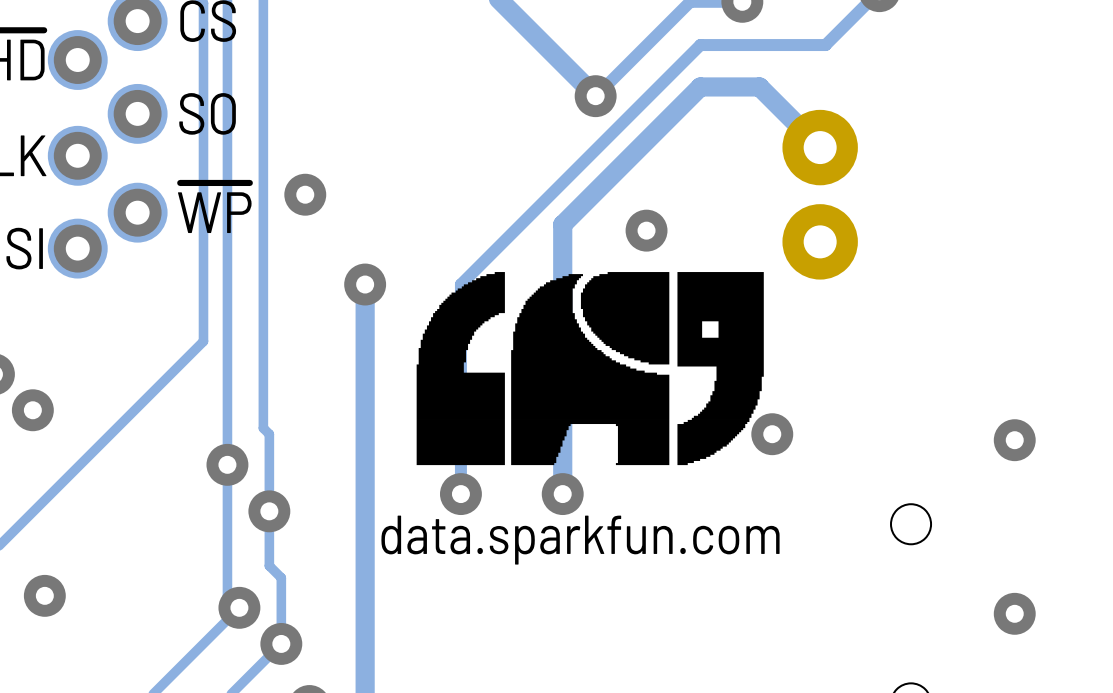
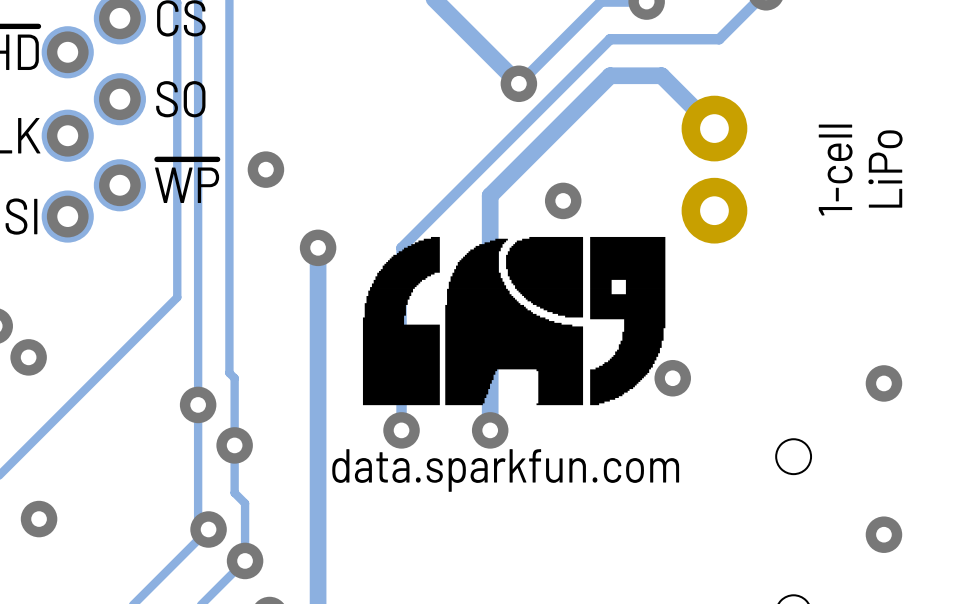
text: none -> LiPo (885, 168)
text: none -> 1-cell (835, 170)

